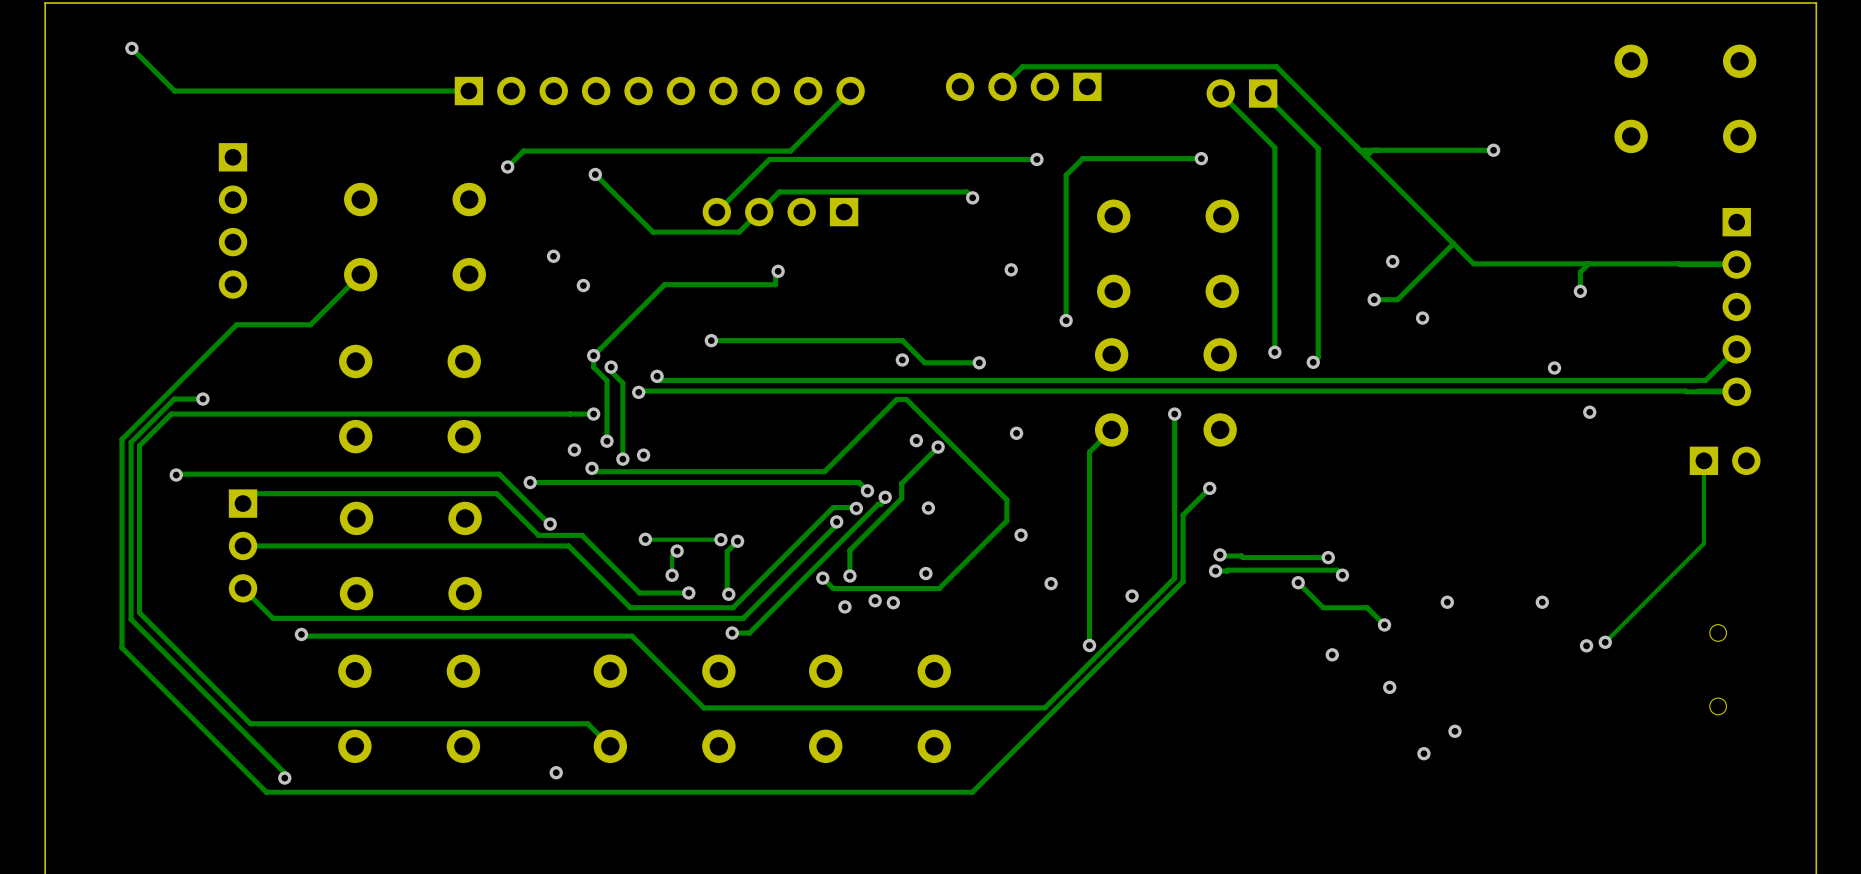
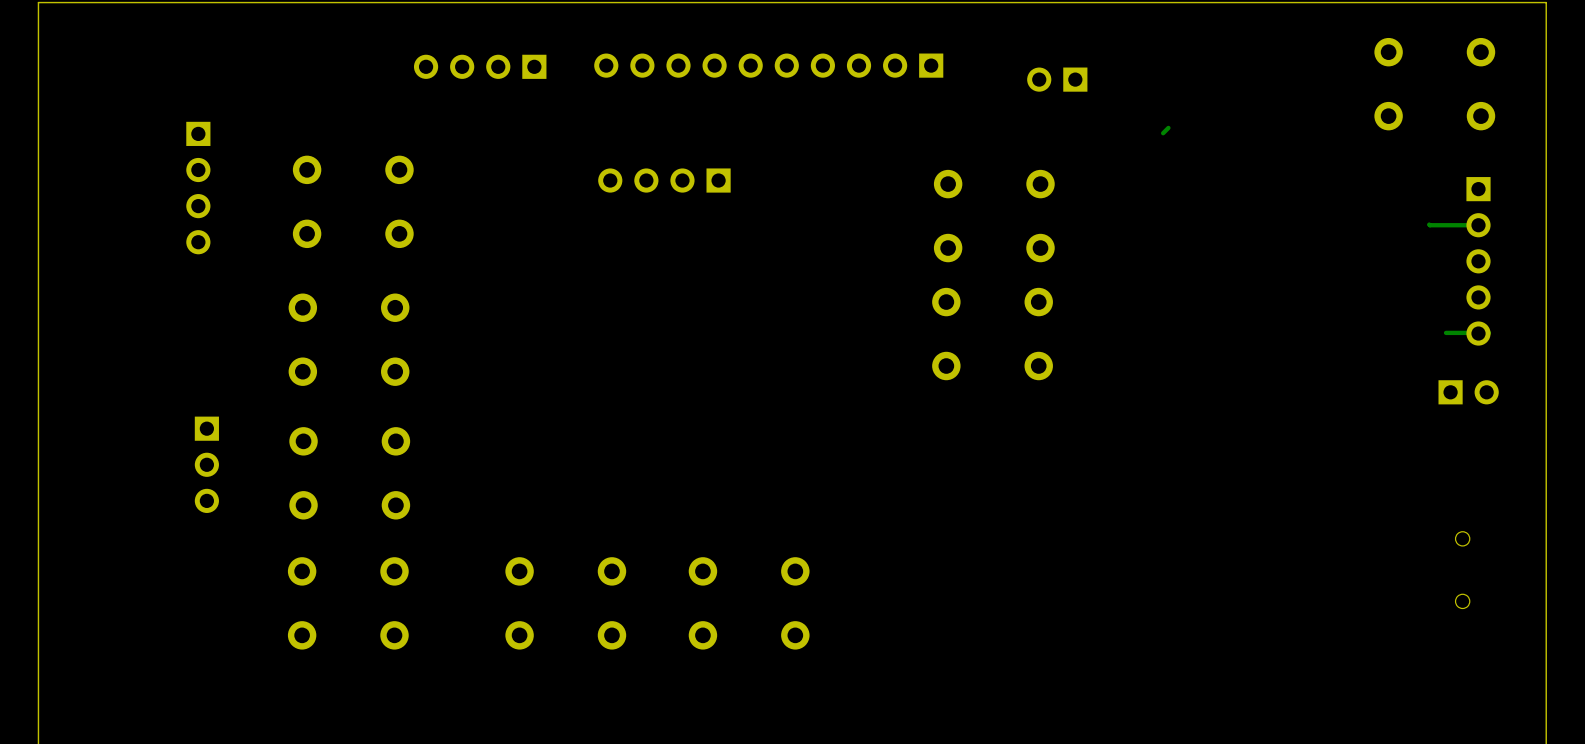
track: (131, 48) (174, 91) (468, 91) -> none
via: (131, 48) -> none
part: none -> (480, 66)
track: (1002, 86) (1022, 66) (1276, 66) (1473, 263) (1749, 263) -> none
part: (1023, 86) -> none
part rotation: 0° (659, 91) -> 180° (768, 65)
track: (850, 91) (790, 151) (523, 151) (507, 166) -> none
track: (1220, 93) (1274, 147) (1274, 352) -> none
track: (1263, 93) (1318, 148) (1318, 357) (1313, 362) -> none
track: (1493, 150) (1360, 150) -> none
via: (1493, 150) -> none
track: (1201, 158) (1082, 158) (1066, 175) (1066, 320) -> none
via: (1201, 158) -> none
track: (1036, 159) (769, 159) (716, 212) -> none
via: (1036, 159) -> none
via: (507, 166) -> none
track: (595, 174) (652, 232) (739, 232) (779, 191) (966, 191) (972, 197) -> none
via: (595, 174) -> none
via: (972, 197) -> none
track: (1453, 243) (1397, 299) (1374, 299) -> none
via: (553, 256) -> none
via: (1392, 261) -> none
track: (1588, 263) (1580, 272) (1580, 291) -> none
via: (1011, 269) -> none
track: (778, 271) (775, 273) (775, 284) (664, 284) (593, 355) (593, 367) (607, 380) (607, 441) -> none
via: (778, 271) -> none
track: (360, 274) (310, 324) (236, 324) (121, 439) (121, 647) (266, 792) (972, 792) (1183, 581) (1183, 515) (1209, 488) -> none
via: (583, 285) -> none
via: (1580, 291) -> none
via: (1374, 299) -> none
via: (1422, 318) -> none
via: (1066, 320) -> none
track: (711, 340) (902, 340) (924, 362) (979, 362) -> none
via: (711, 340) -> none
track: (1736, 349) (1705, 380) (657, 380) (657, 376) -> none
via: (1274, 352) -> none
via: (593, 355) -> none
via: (902, 359) -> none
via: (979, 362) -> none
via: (1313, 362) -> none
track: (611, 367) (609, 369) (622, 383) (622, 459) -> none
via: (611, 367) -> none
via: (1554, 368) -> none
via: (657, 376) -> none
track: (1736, 391) (638, 392) -> none
via: (638, 392) -> none
track: (202, 399) (174, 399) (131, 442) (131, 619) (284, 773) (284, 778) -> none
via: (202, 399) -> none
via: (1589, 412) -> none
track: (593, 414) (171, 414) (139, 445) (139, 612) (250, 723) (587, 723) (610, 746) -> none
via: (593, 414) -> none
track: (1174, 414) (1174, 578) (1044, 707) (703, 707) (632, 636) (303, 636) (301, 634) -> none
via: (1174, 414) -> none
track: (1111, 429) (1089, 452) (1089, 645) -> none
via: (1016, 433) -> none
via: (916, 440) -> none
via: (607, 441) -> none
track: (938, 447) (901, 483) (901, 498) (849, 550) (849, 576) -> none
via: (938, 447) -> none
via: (574, 449) -> none
via: (643, 455) -> none
via: (622, 459) -> none
track: (1703, 460) (1703, 543) (1605, 642) -> none
track: (591, 468) (595, 471) (824, 471) (896, 399) (906, 399) (1006, 499) (1006, 520) (939, 588) (833, 588) (822, 578) -> none
via: (591, 468) -> none
track: (176, 475) (499, 474) (550, 524) -> none
via: (176, 475) -> none
track: (530, 482) (859, 482) (867, 490) -> none
via: (530, 482) -> none
via: (1209, 488) -> none
via: (867, 490) -> none
track: (885, 497) (887, 497) (878, 504) (749, 633) (732, 633) -> none
via: (885, 497) -> none
track: (243, 503) (252, 493) (496, 493) (538, 535) (582, 535) (639, 592) (688, 592) -> none
track: (856, 508) (833, 507) (733, 607) (630, 607) (568, 545) (243, 545) -> none
via: (856, 508) -> none
via: (928, 508) -> none
track: (836, 521) (836, 525) (743, 618) (272, 618) (243, 588) -> none
via: (836, 521) -> none
via: (550, 524) -> none
via: (1021, 535) -> none
track: (645, 539) (720, 539) -> none
via: (645, 539) -> none
via: (720, 539) -> none
track: (737, 541) (727, 551) (727, 592) (728, 594) -> none
via: (737, 541) -> none
track: (677, 551) (672, 556) (672, 575) -> none
via: (677, 551) -> none
track: (1220, 554) (1243, 557) (1328, 557) -> none
via: (1220, 554) -> none
via: (1328, 557) -> none
track: (1215, 571) (1337, 570) (1342, 575) -> none
via: (1215, 571) -> none
via: (925, 573) -> none
via: (672, 575) -> none
via: (1342, 575) -> none
via: (849, 576) -> none
via: (822, 578) -> none
track: (1298, 582) (1323, 607) (1367, 607) (1384, 624) -> none
via: (1298, 582) -> none
via: (1051, 583) -> none
via: (688, 592) -> none
via: (728, 594) -> none
via: (1132, 596) -> none
via: (875, 600) -> none
via: (893, 602) -> none
via: (1447, 602) -> none
via: (1542, 602) -> none
via: (844, 606) -> none
via: (1384, 624) -> none
via: (732, 633) -> none
via: (301, 634) -> none
via: (1605, 642) -> none
via: (1089, 645) -> none
via: (1586, 645) -> none
via: (1332, 654) -> none
via: (1389, 687) -> none
via: (1455, 731) -> none
via: (1423, 753) -> none
via: (556, 772) -> none
via: (284, 778) -> none

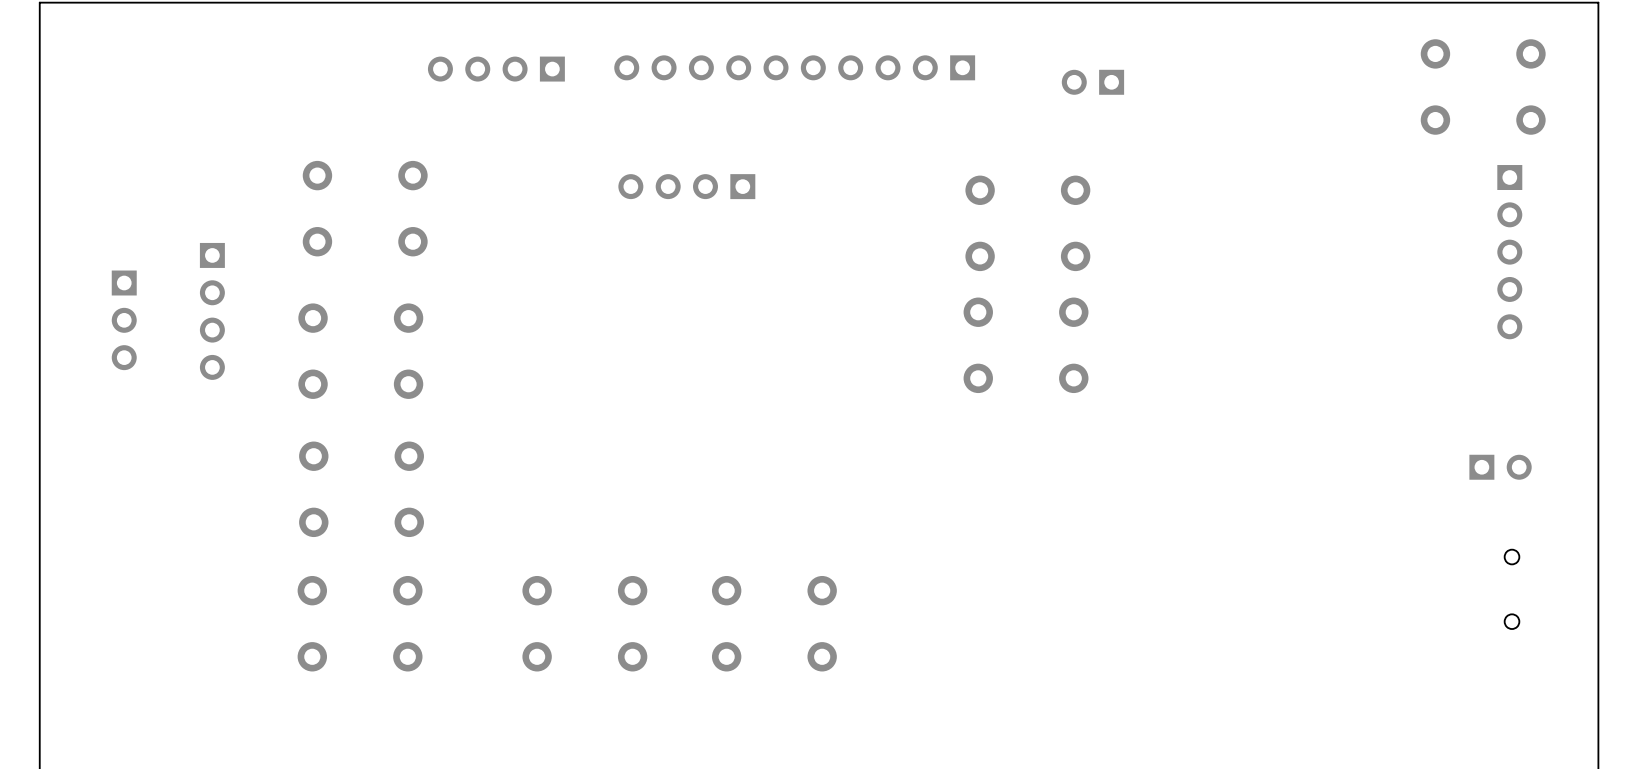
track: (1168, 127) (1163, 133) -> none
part position: (198, 188) -> (212, 311)
track: (1429, 224) (1478, 225) -> none
part position: (1478, 261) -> (1509, 252)
track: (1488, 332) (1446, 332) -> none
part position: (1468, 392) -> (1500, 467)
part position: (206, 464) -> (124, 320)

